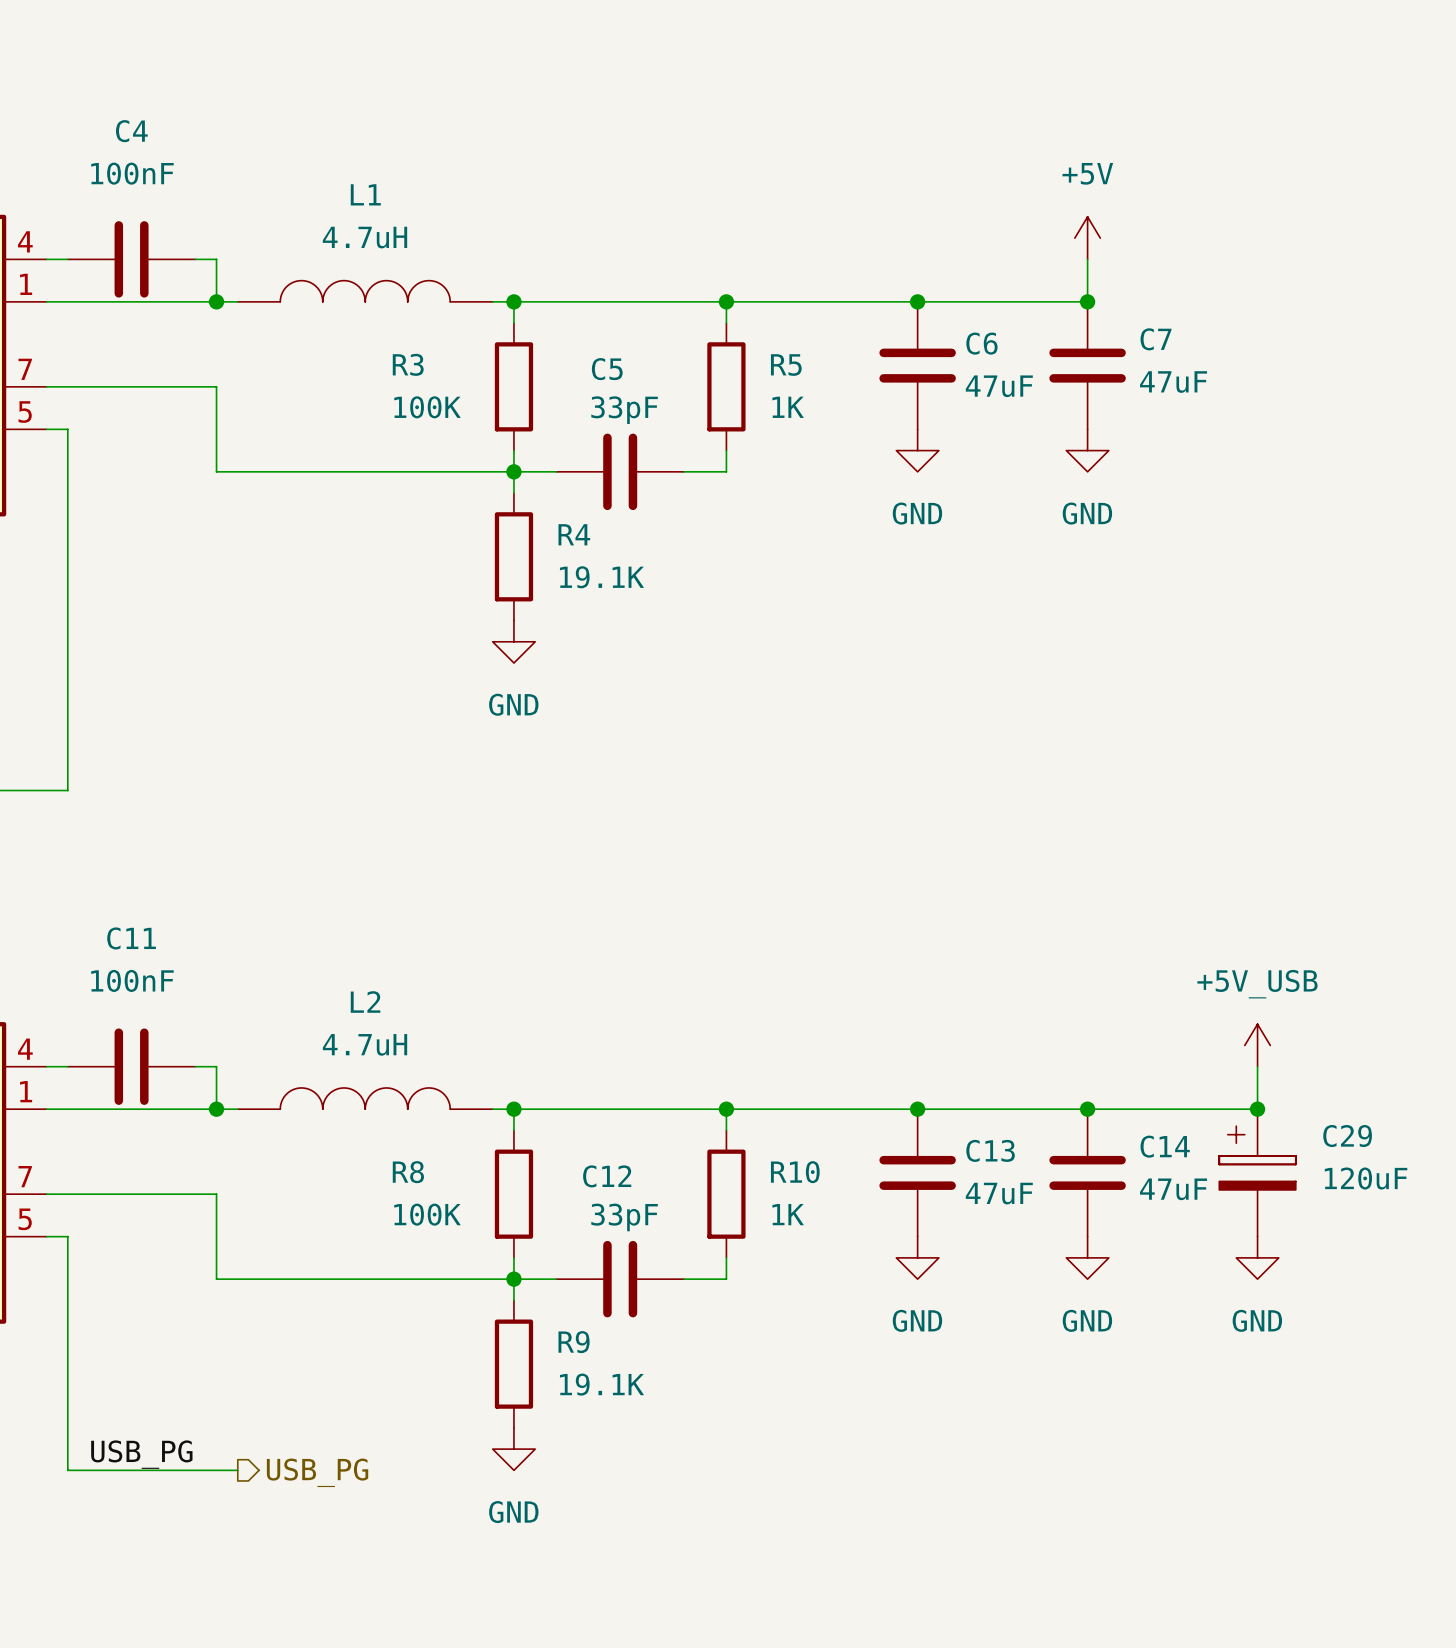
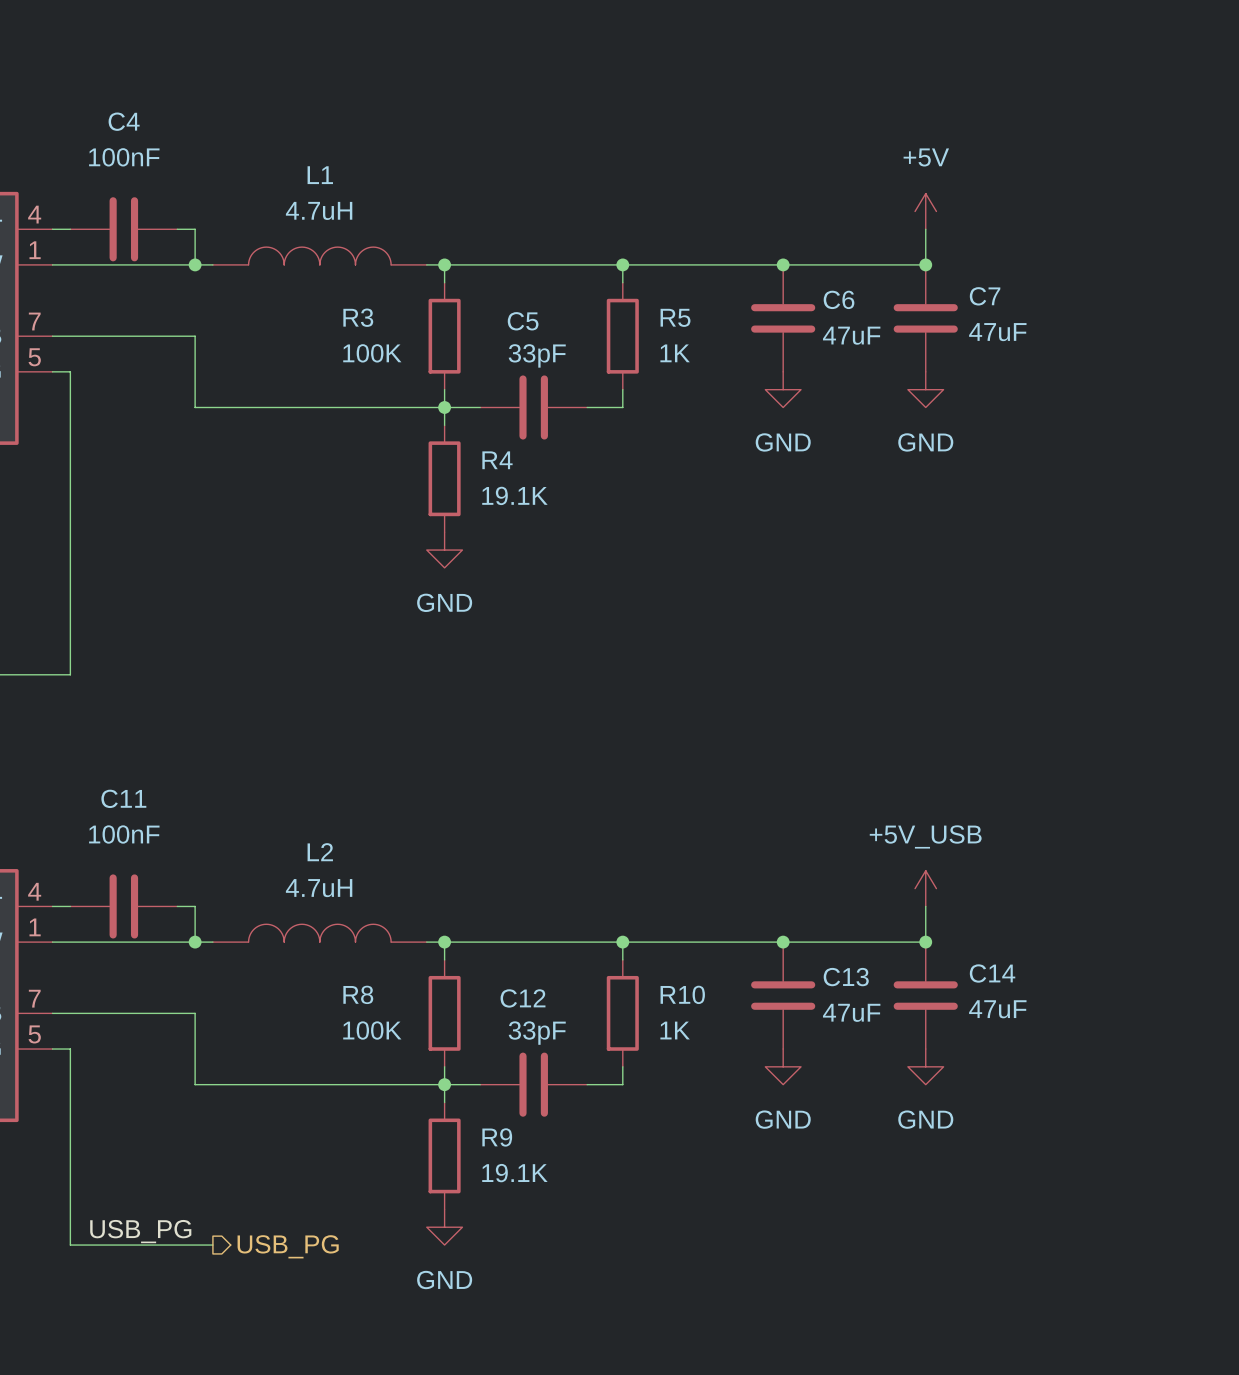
power symbol position: +5V_USB (1257, 1045) -> +5V_USB (925, 888)
wire: (1257, 1066) (1257, 1109) (1087, 1109) -> (925, 906) (925, 942)
junction: (1257, 1109) -> none
C29: 120uF (1257, 1172) -> none
power symbol: GND (1257, 1257) -> none

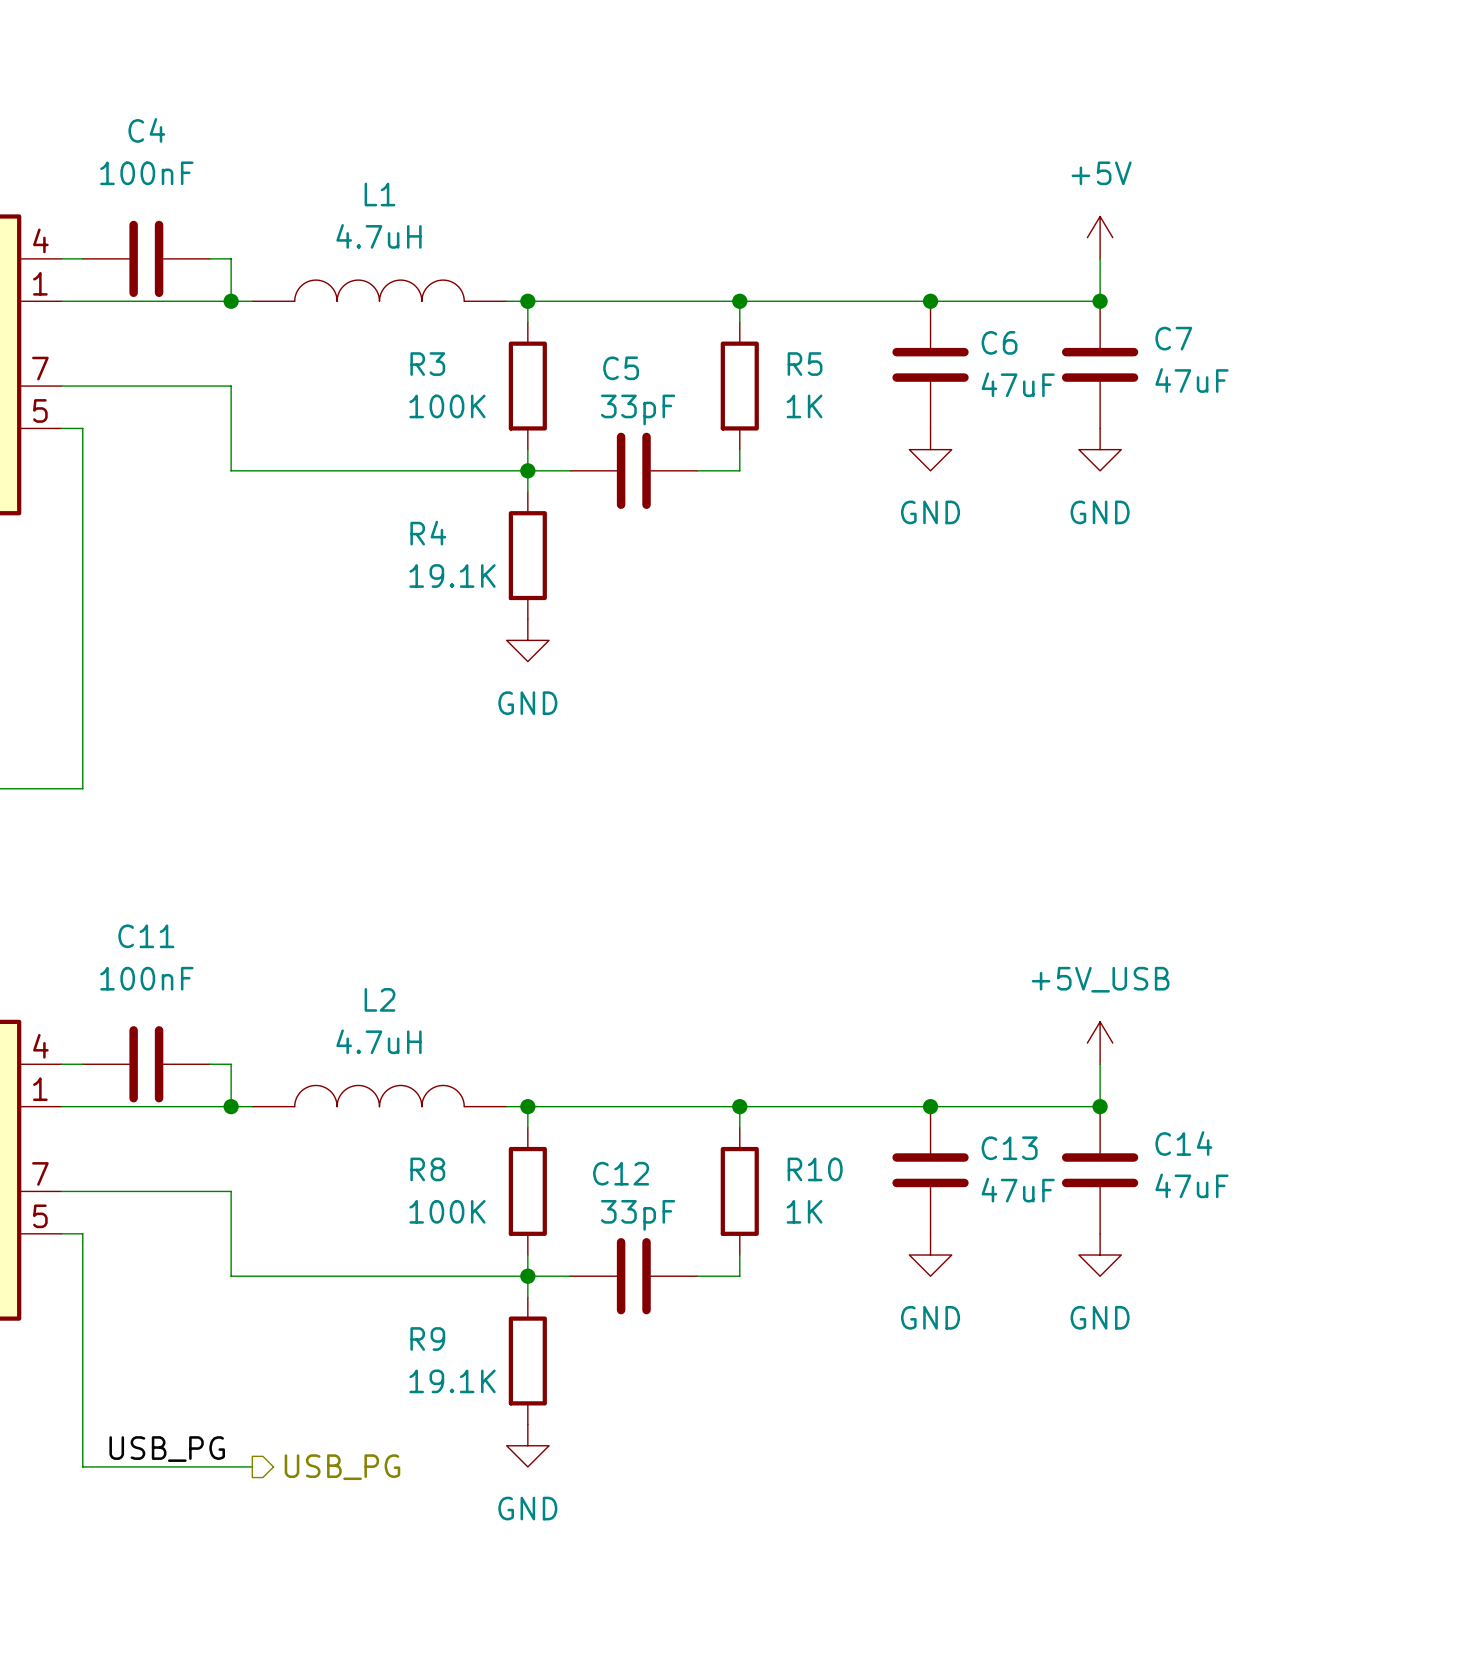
R4 name position: R4 (497, 460) -> R4 (428, 533)
R4 value position: 19.1K (514, 495) -> 19.1K (452, 576)
R9 name position: R9 (497, 1137) -> R9 (427, 1339)
R9 value position: 19.1K (514, 1173) -> 19.1K (452, 1381)

